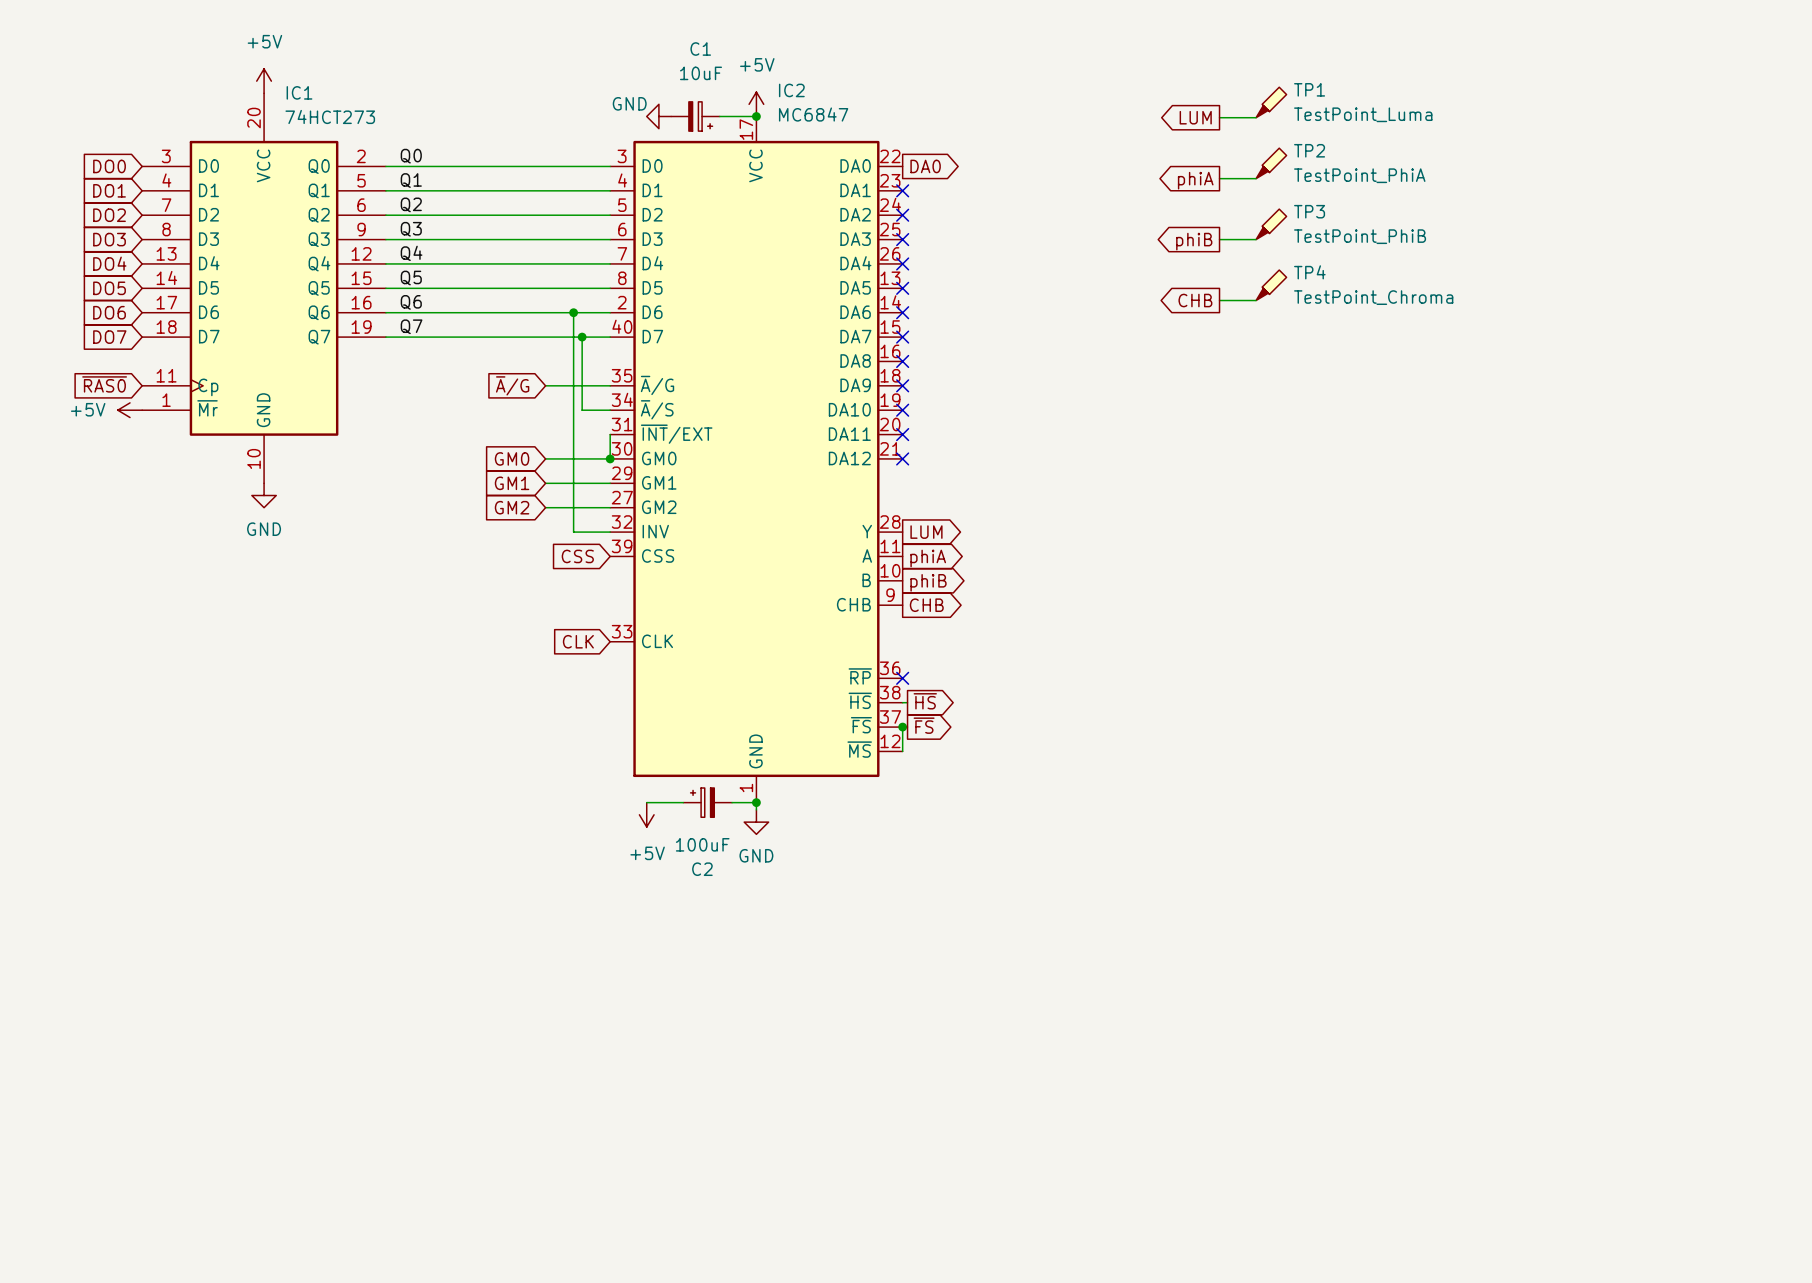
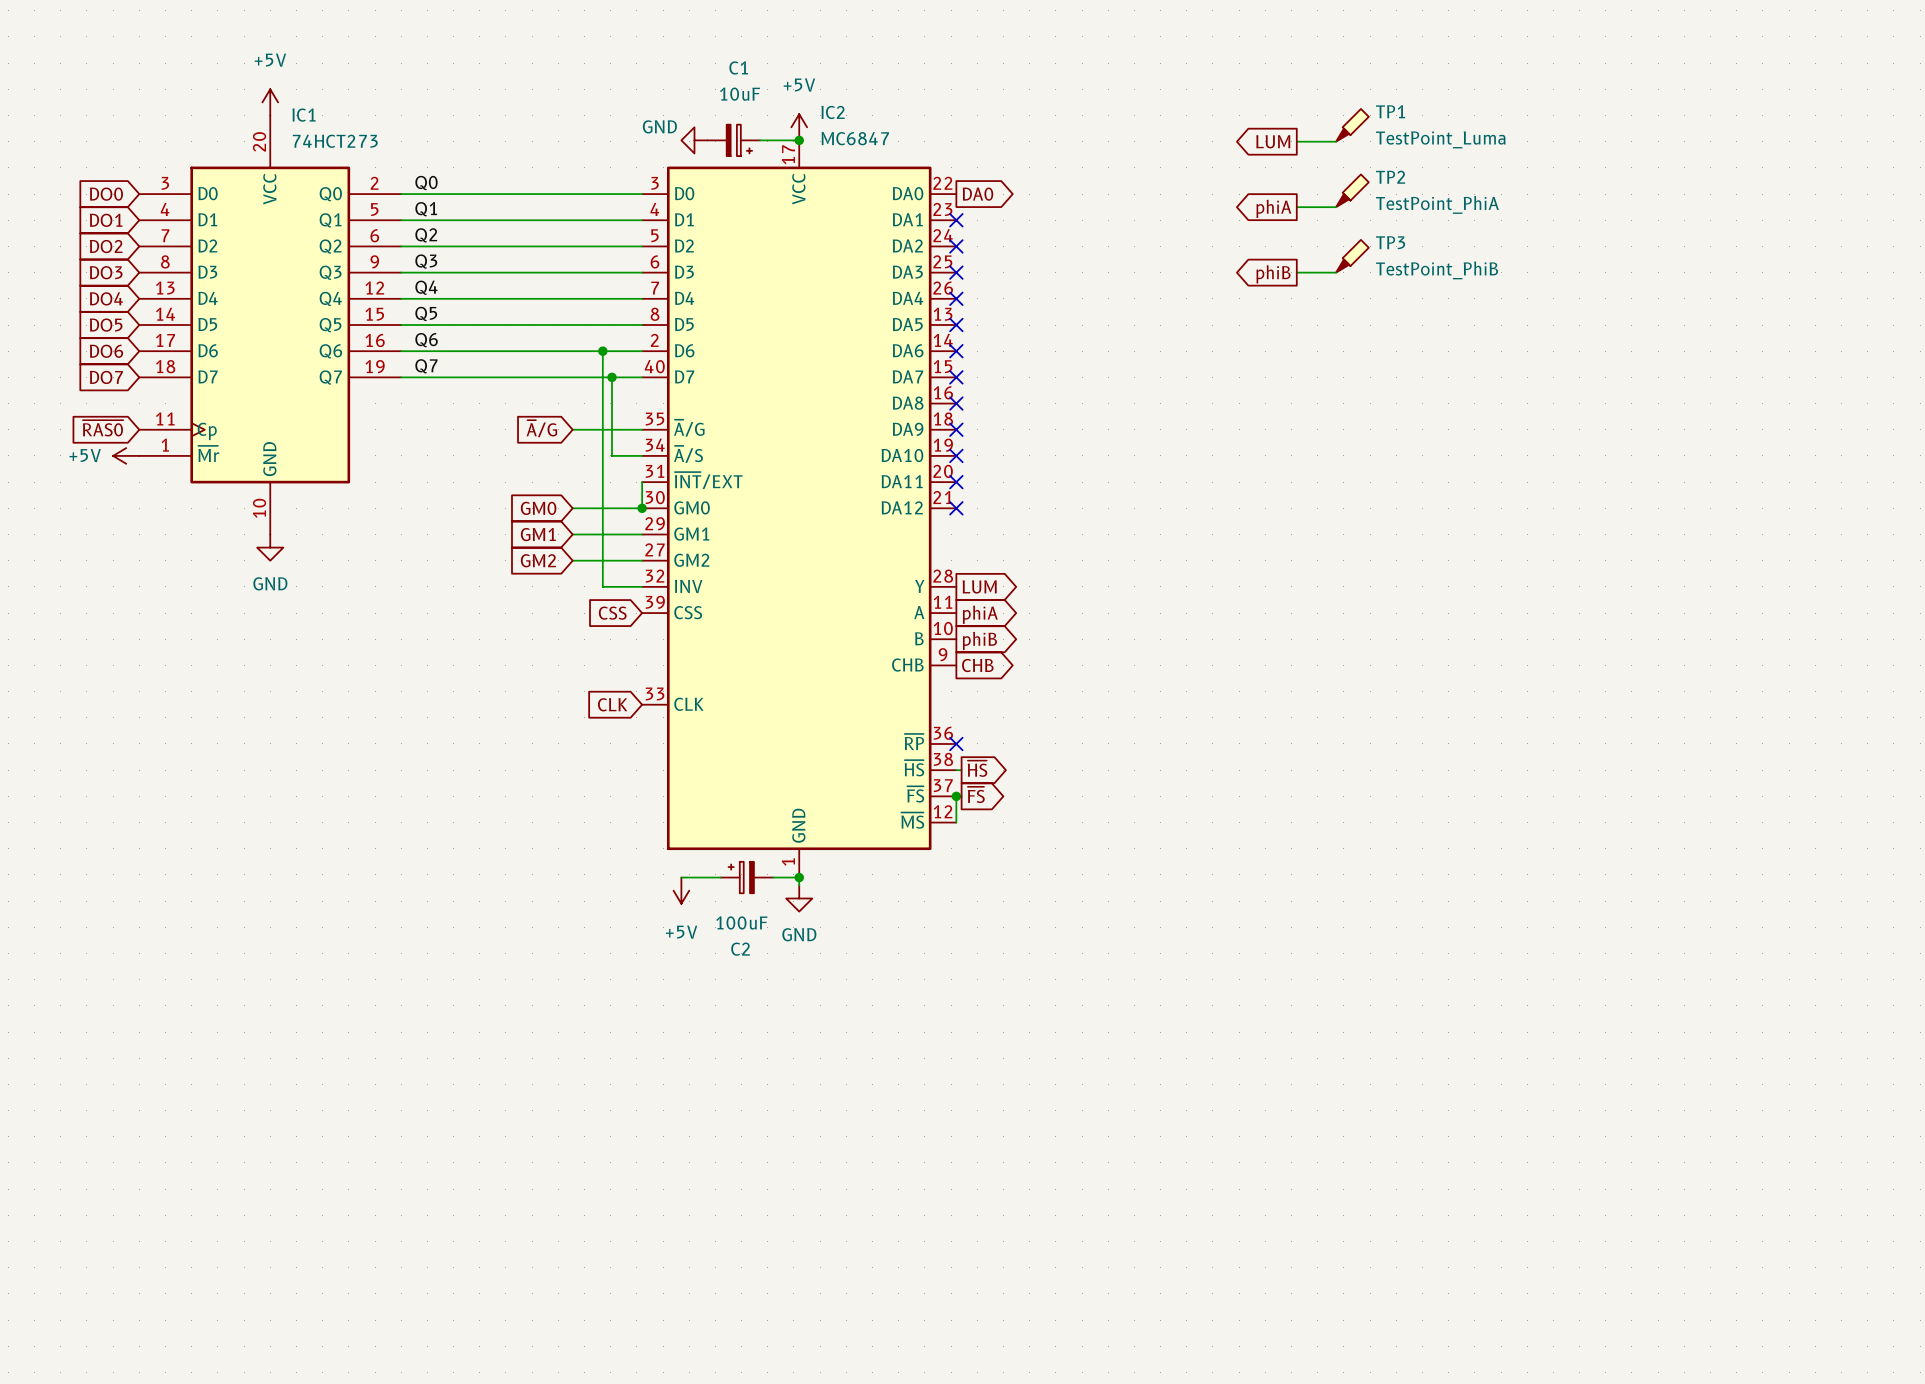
TP4: TestPoint_Chroma (1271, 285) -> none
global label: CHB (1195, 300) -> none
wire: (1219, 300) (1256, 300) -> none

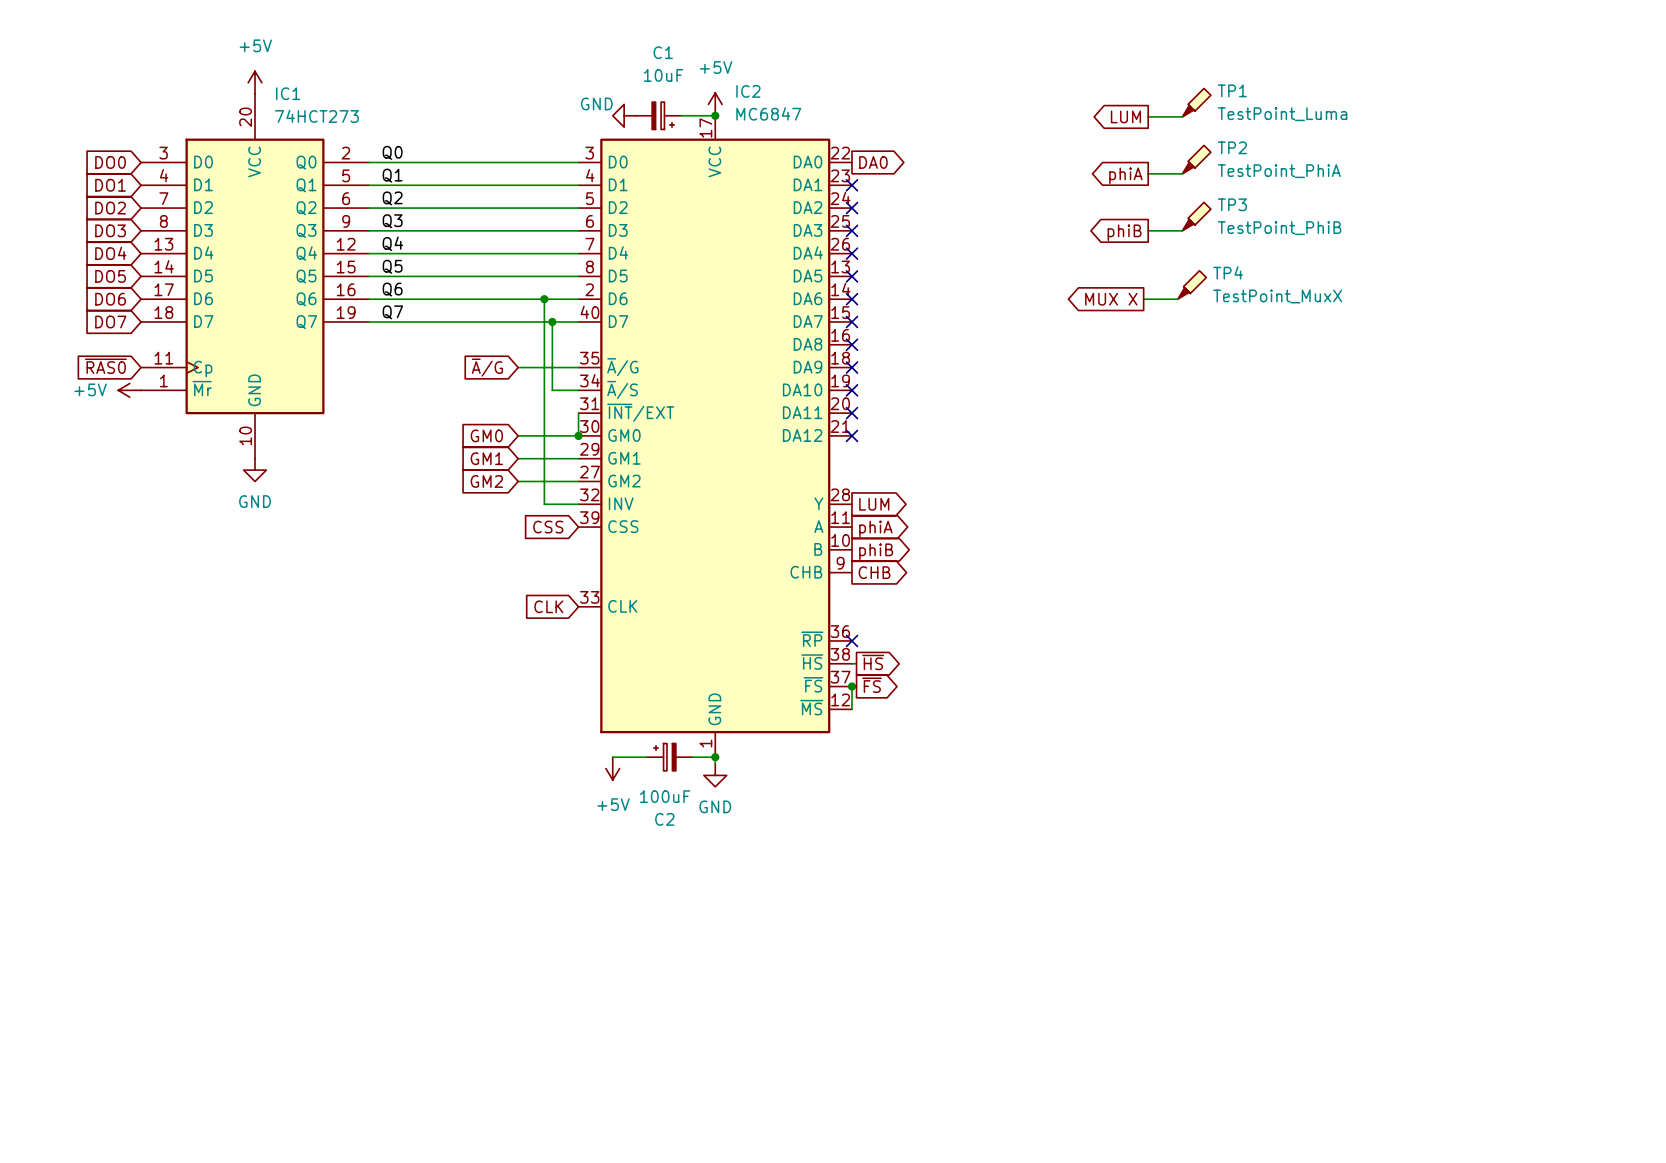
TP4: none -> TestPoint_MuxX (1192, 284)
global label: none -> MUX X (1111, 299)
wire: none -> (1143, 299) (1177, 299)

